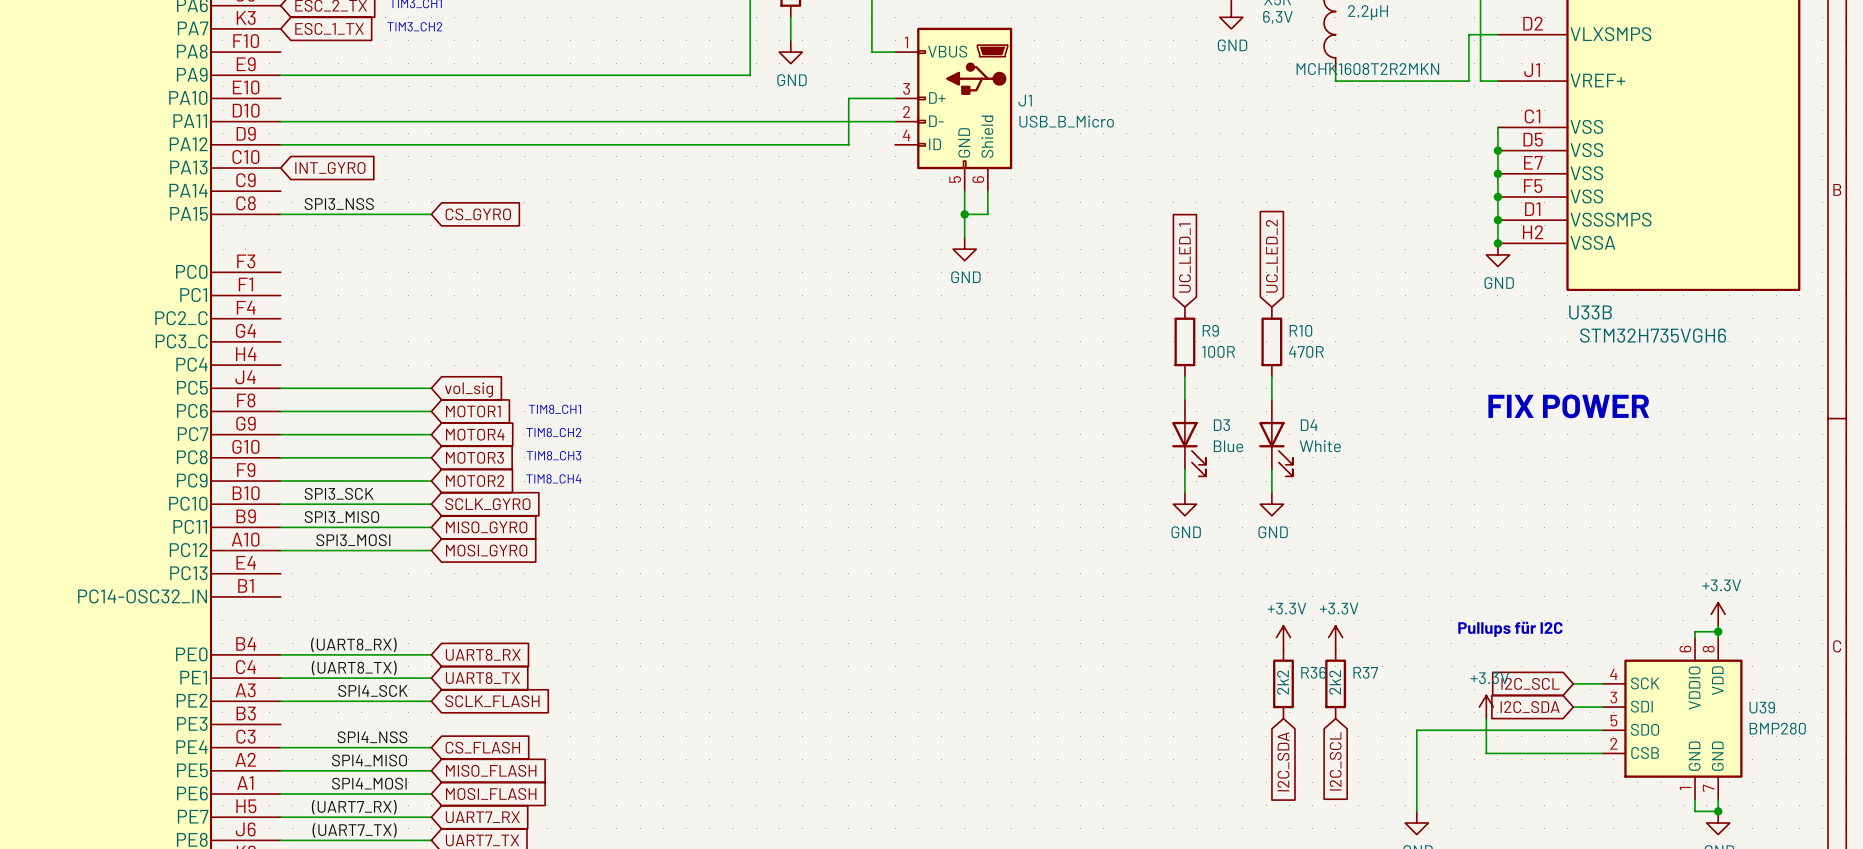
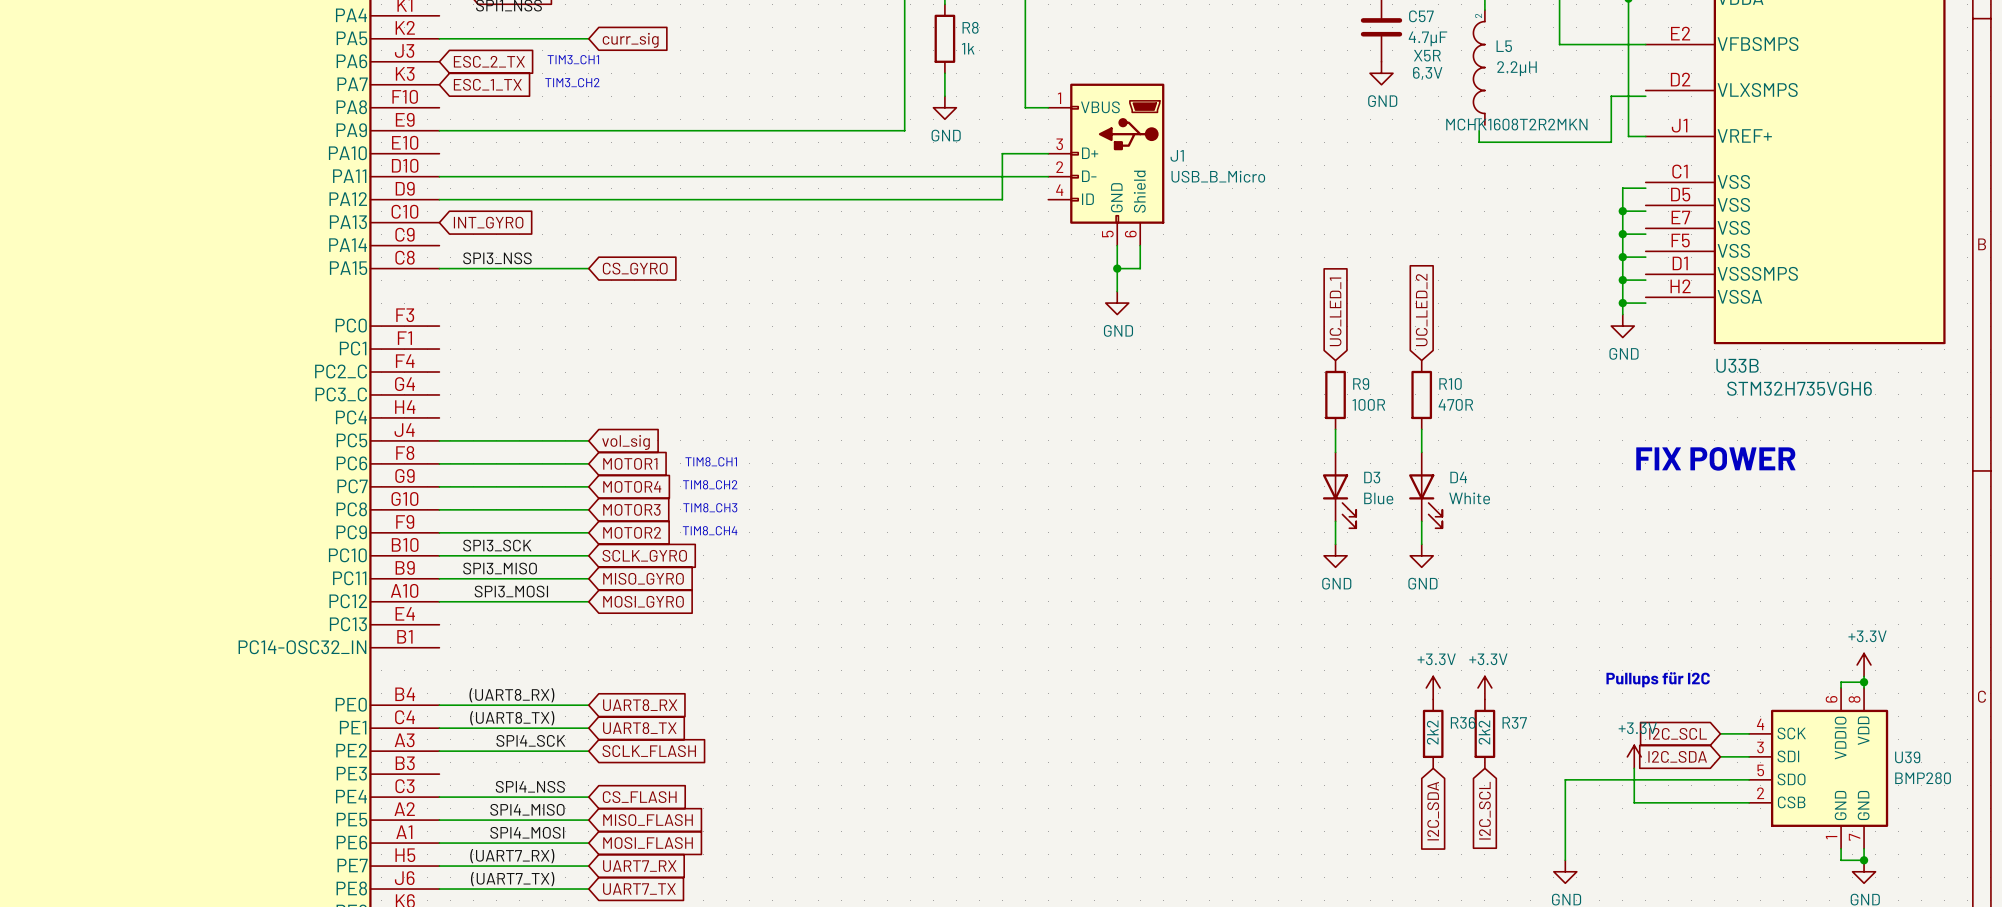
wire: (1497, 34) (1468, 34) (1468, 81) (1335, 81) (1335, 69) -> none
wire: none -> (1645, 96) (1611, 96) (1611, 142) (1479, 142) (1479, 130)
wire: (1497, 127) (1497, 243) -> none
wire: none -> (1645, 188) (1622, 188) (1622, 314)
junction: (1497, 150) -> none
wire: none -> (1622, 211) (1645, 211)
junction: none -> (1622, 211)
junction: (1497, 173) -> none
wire: none -> (1622, 234) (1645, 234)
junction: none -> (1622, 234)
junction: (1497, 196) -> none
wire: none -> (1622, 257) (1645, 257)
junction: none -> (1622, 257)
junction: (1497, 220) -> none
wire: none -> (1622, 280) (1645, 280)
junction: none -> (1622, 280)
junction: (1497, 243) -> none
wire: none -> (1622, 303) (1645, 303)
junction: none -> (1622, 303)
power symbol position: GND (1497, 254) -> GND (1622, 326)

